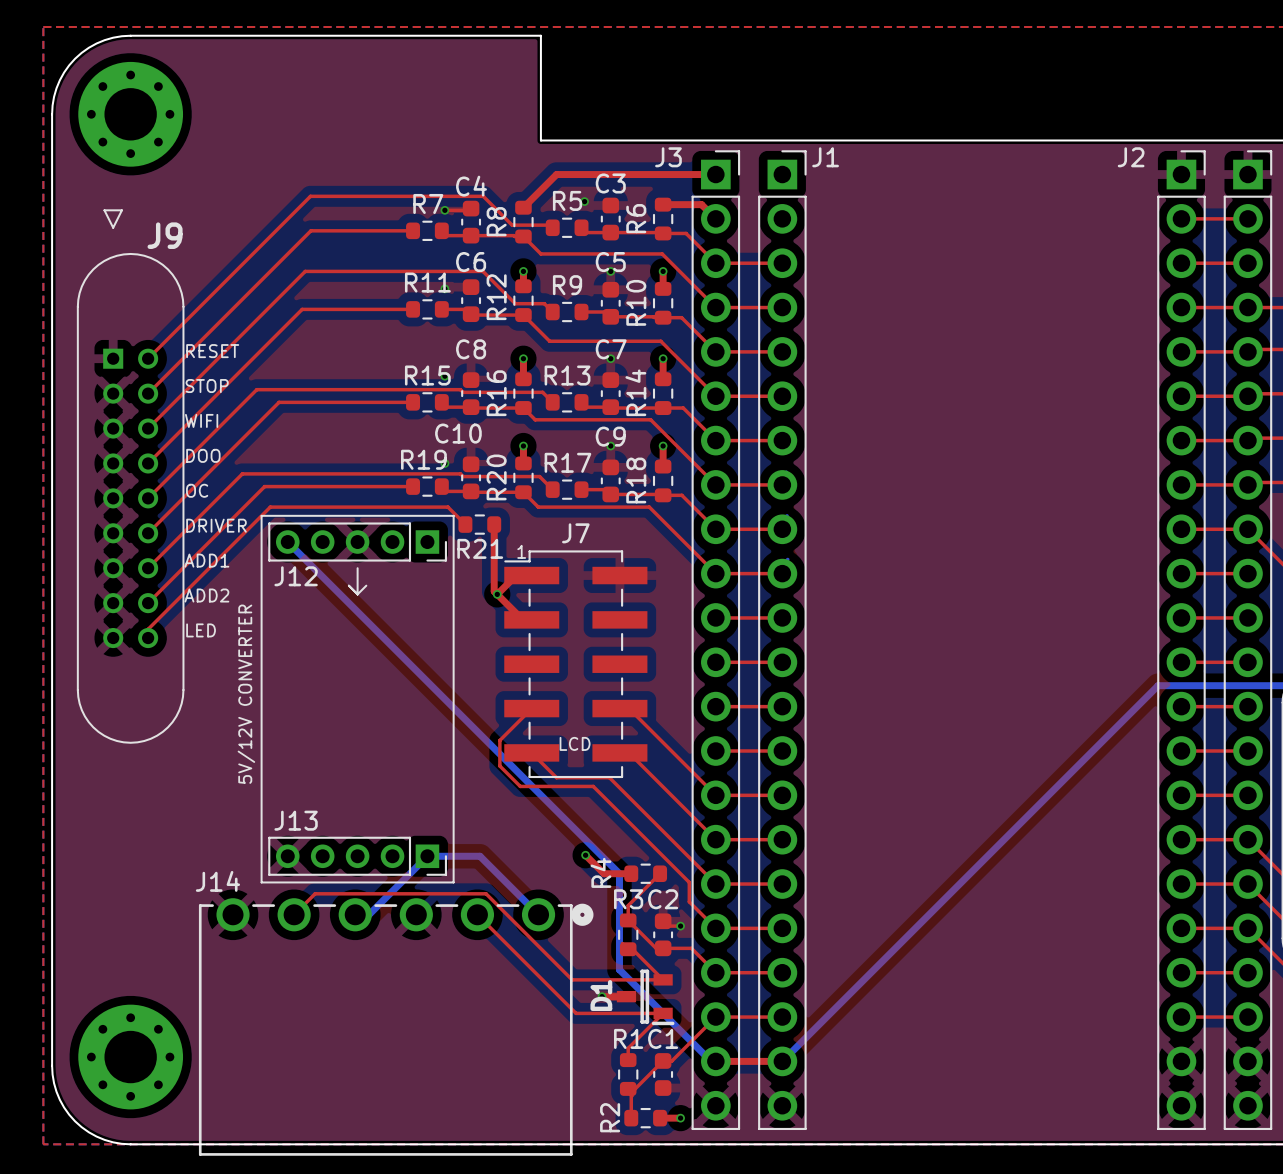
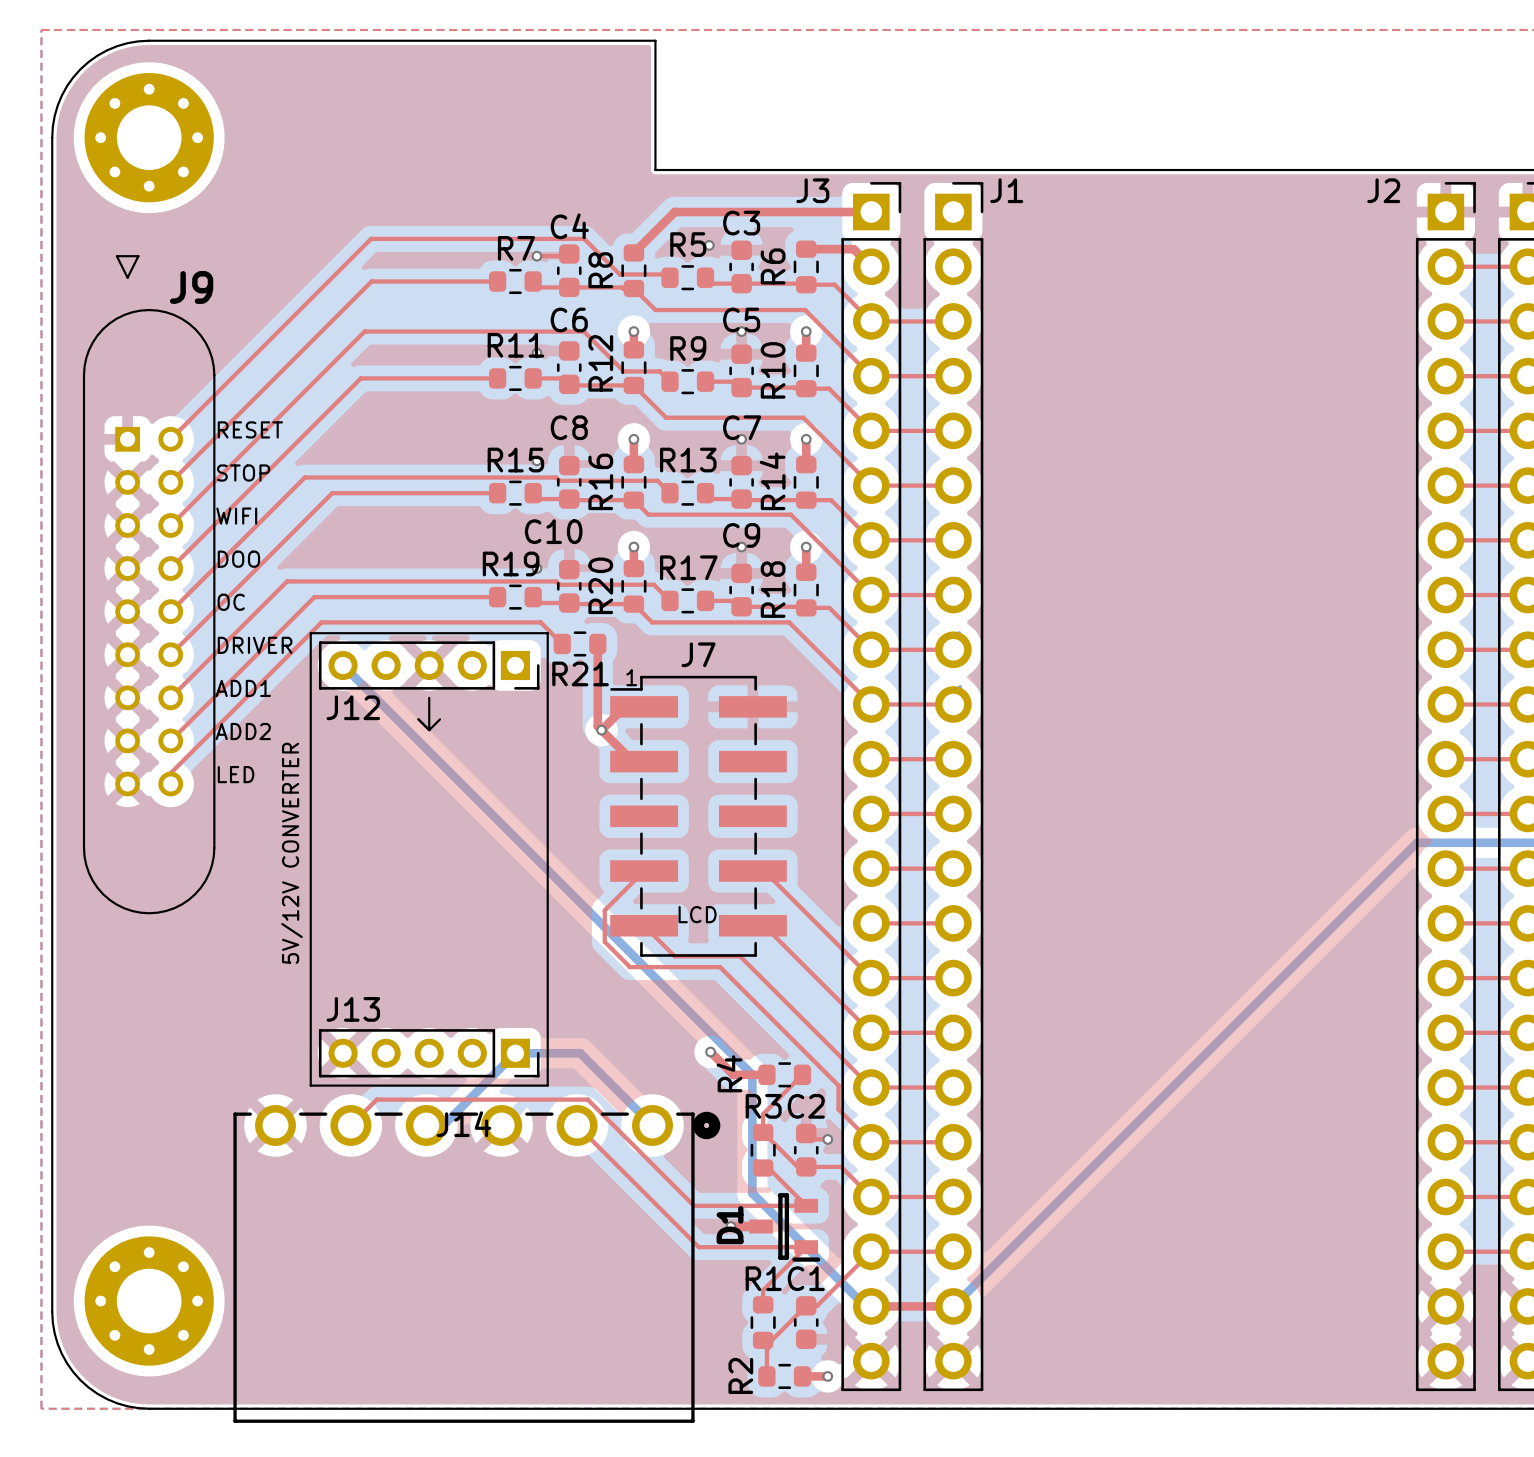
J14 name position: J14 (217, 881) -> J14 (464, 1124)

